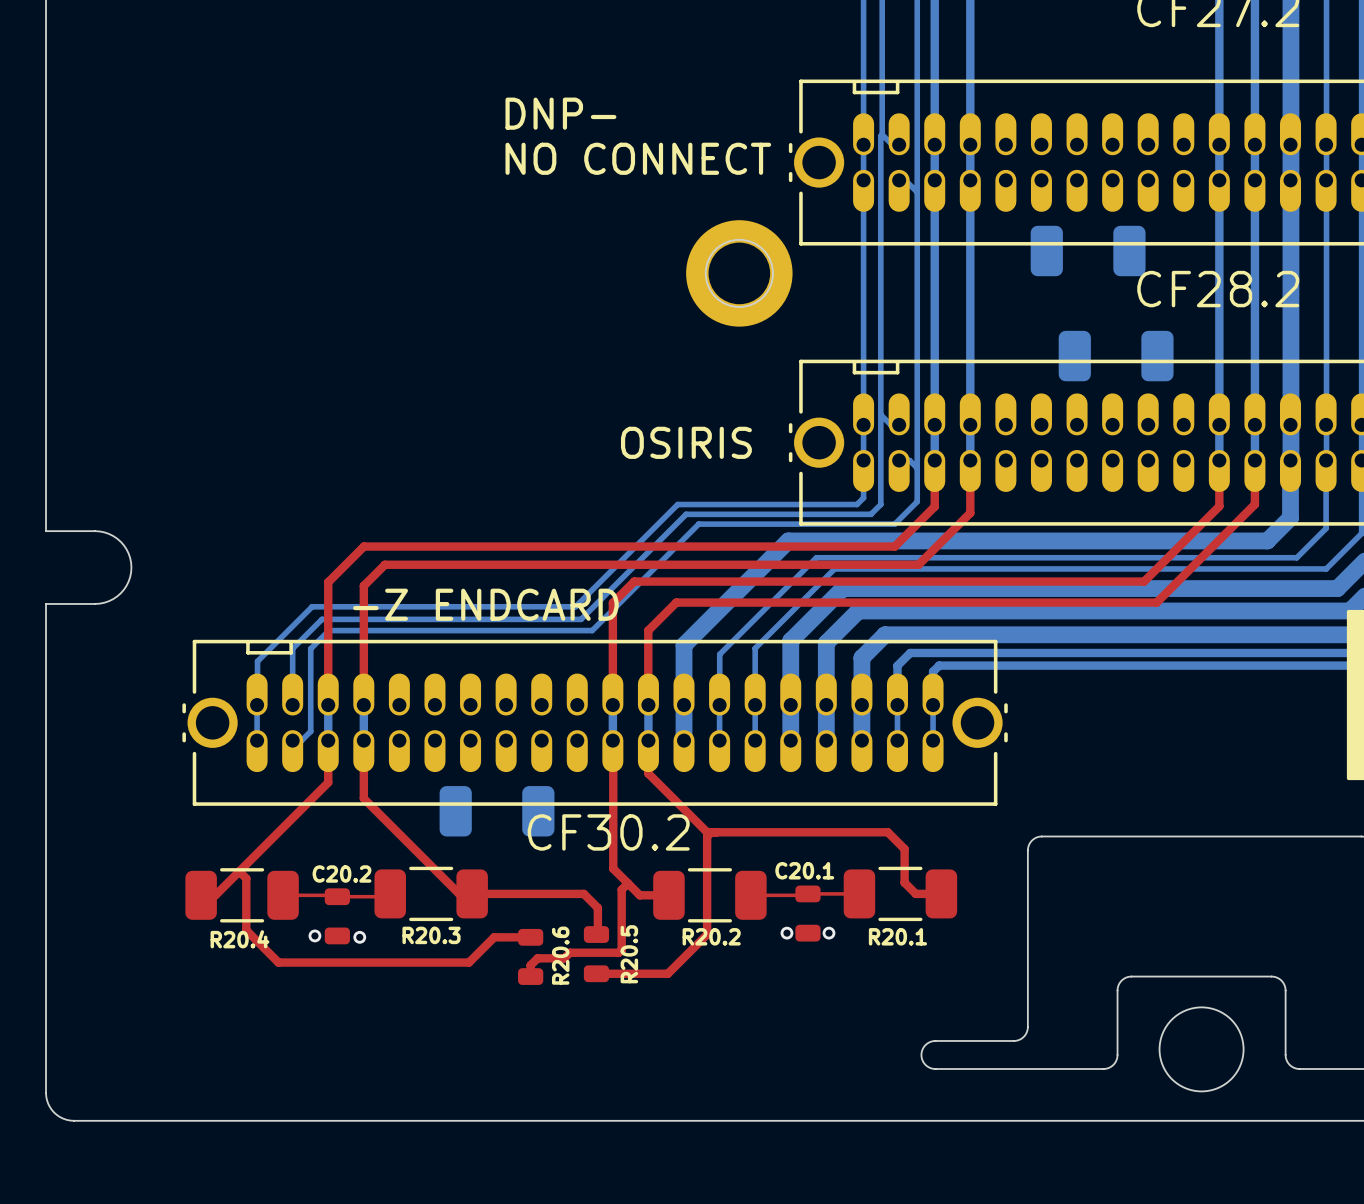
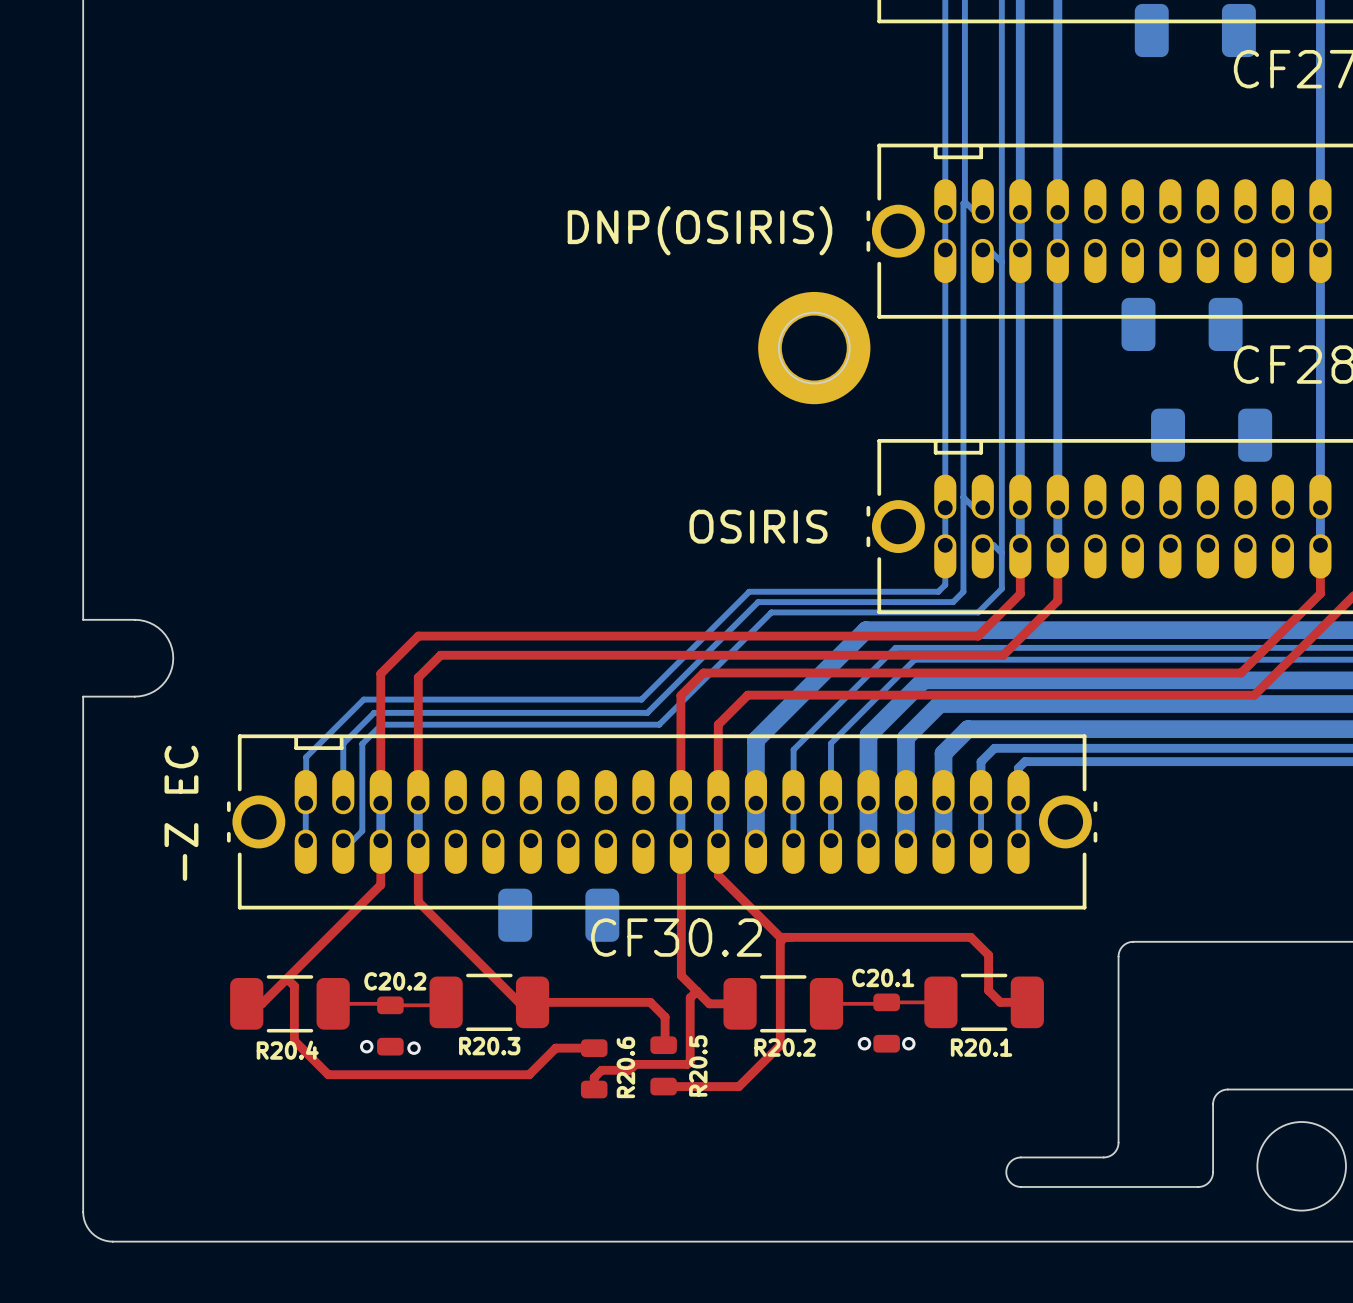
text: DNP- (560, 113) -> none
text: NO CONNECT (638, 158) -> DNP(OSIRIS) (700, 230)
text: -Z ENDCARD (485, 604) -> none
text: none -> -Z EC (181, 813)

